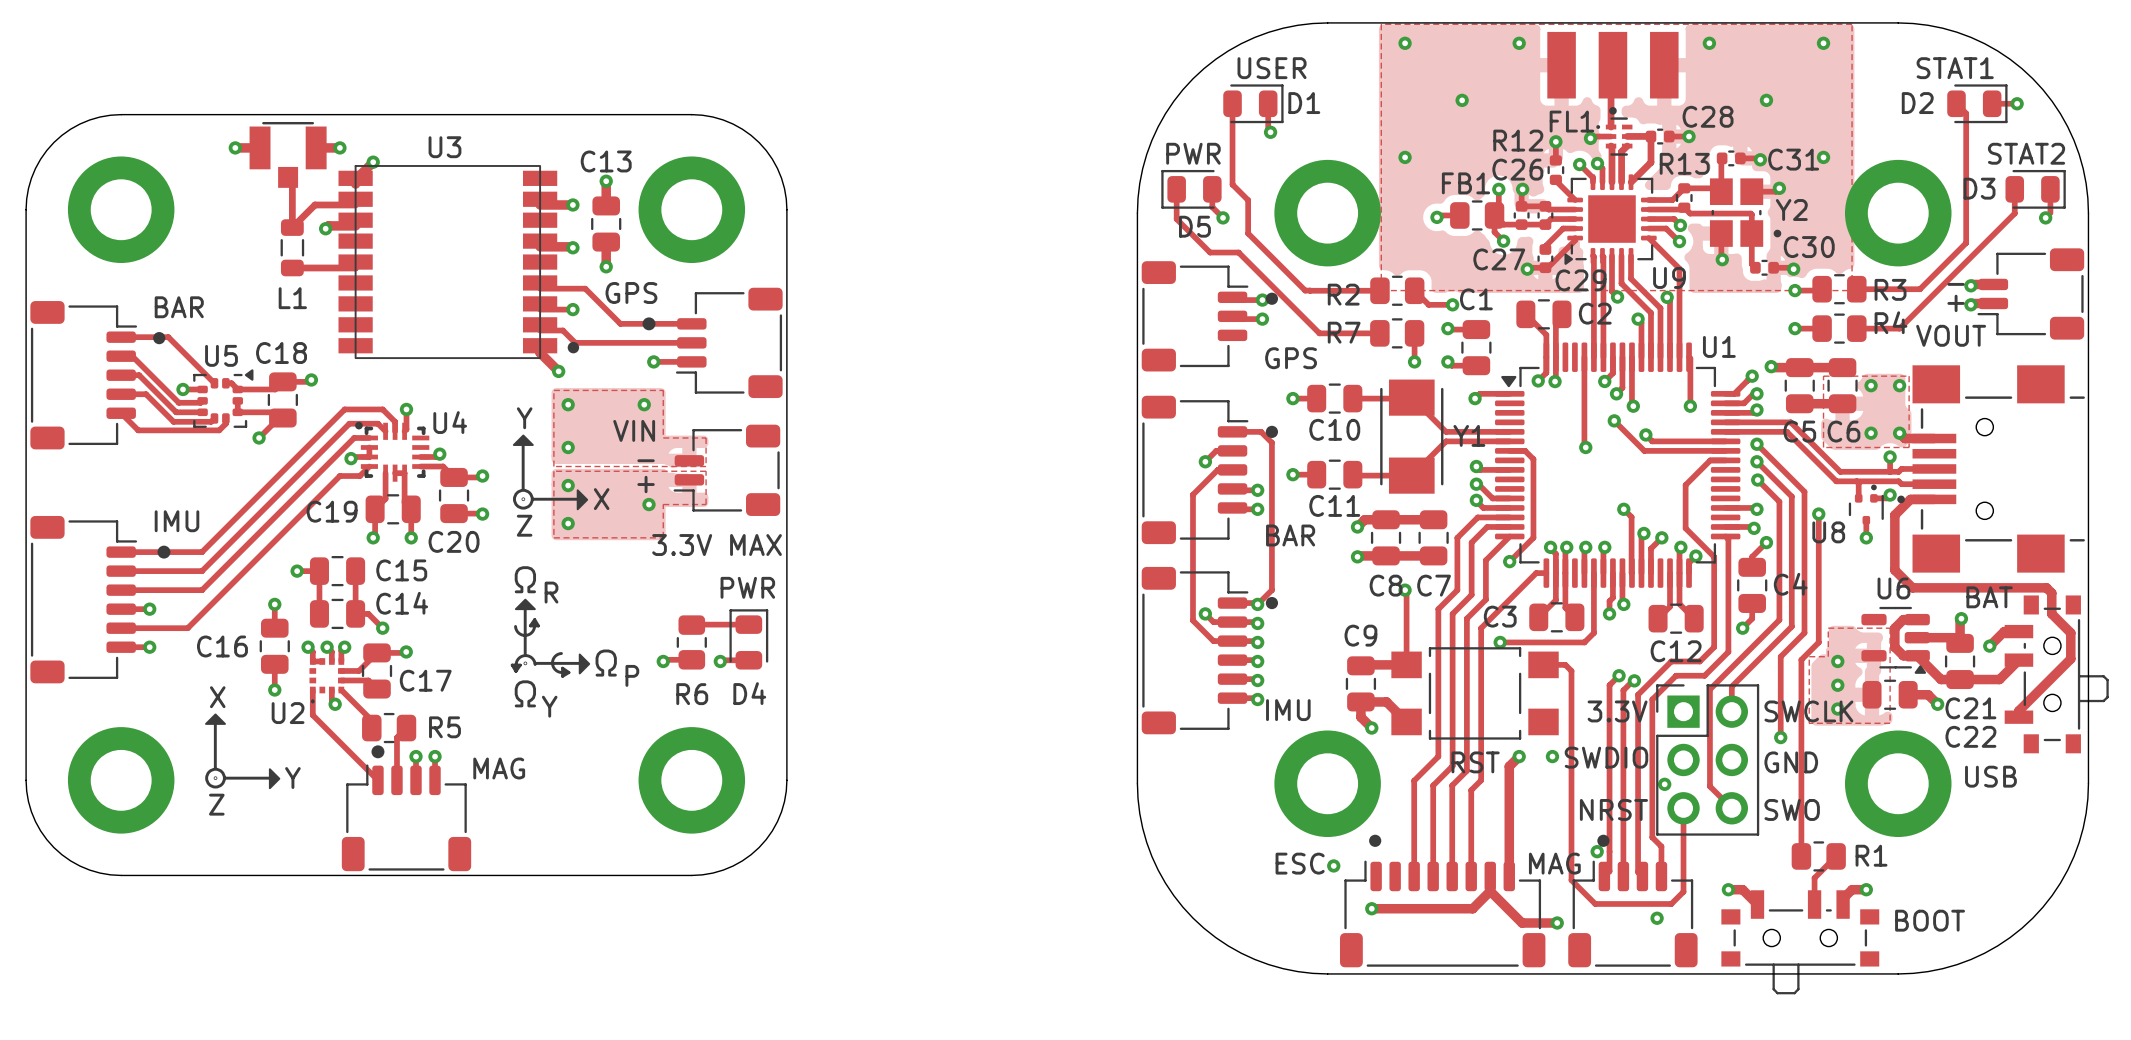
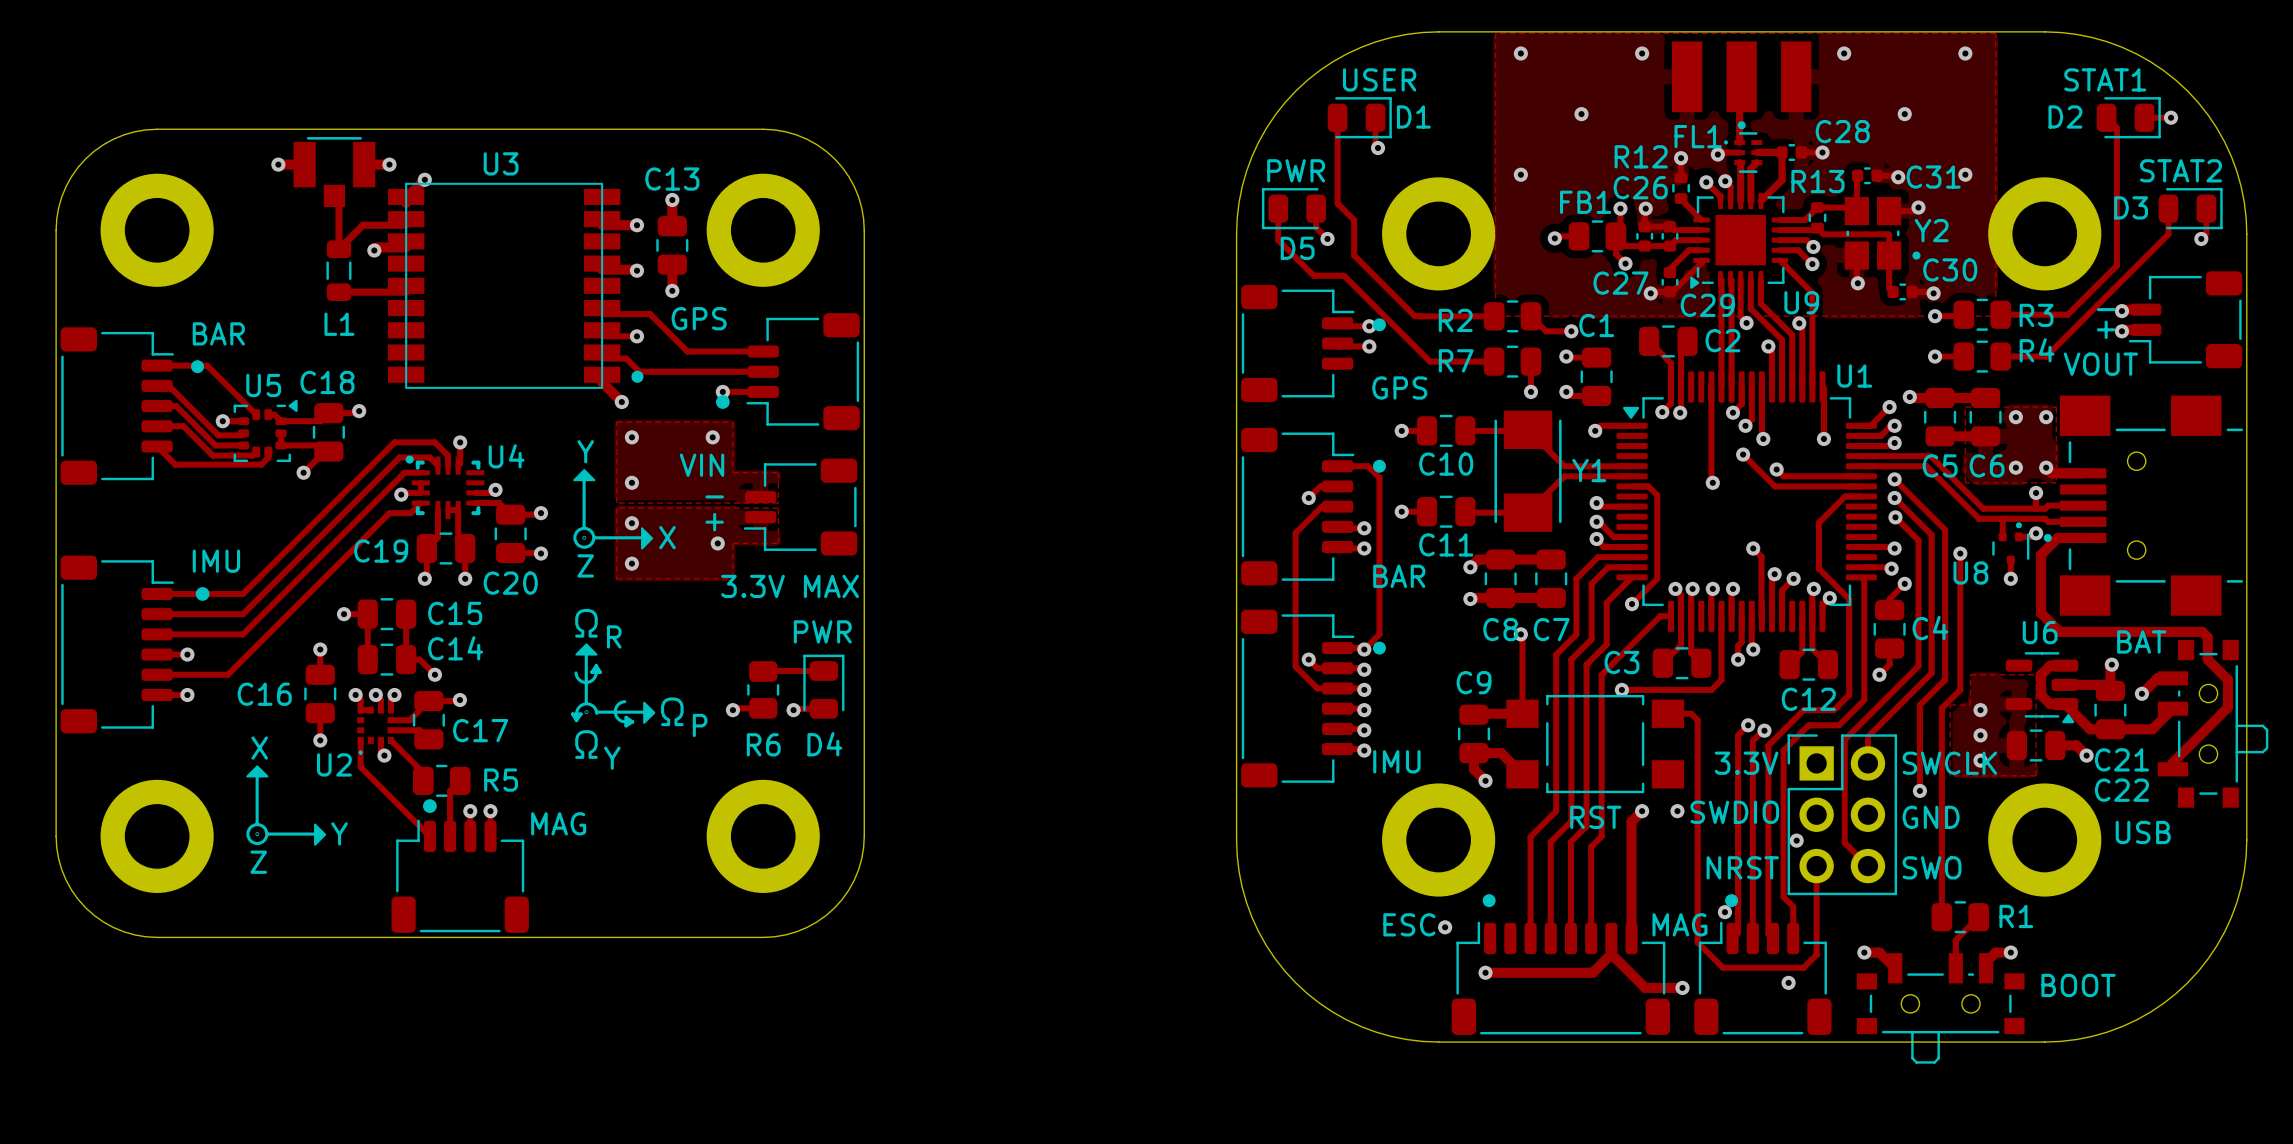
drawing position: (649, 323) -> (722, 402)

